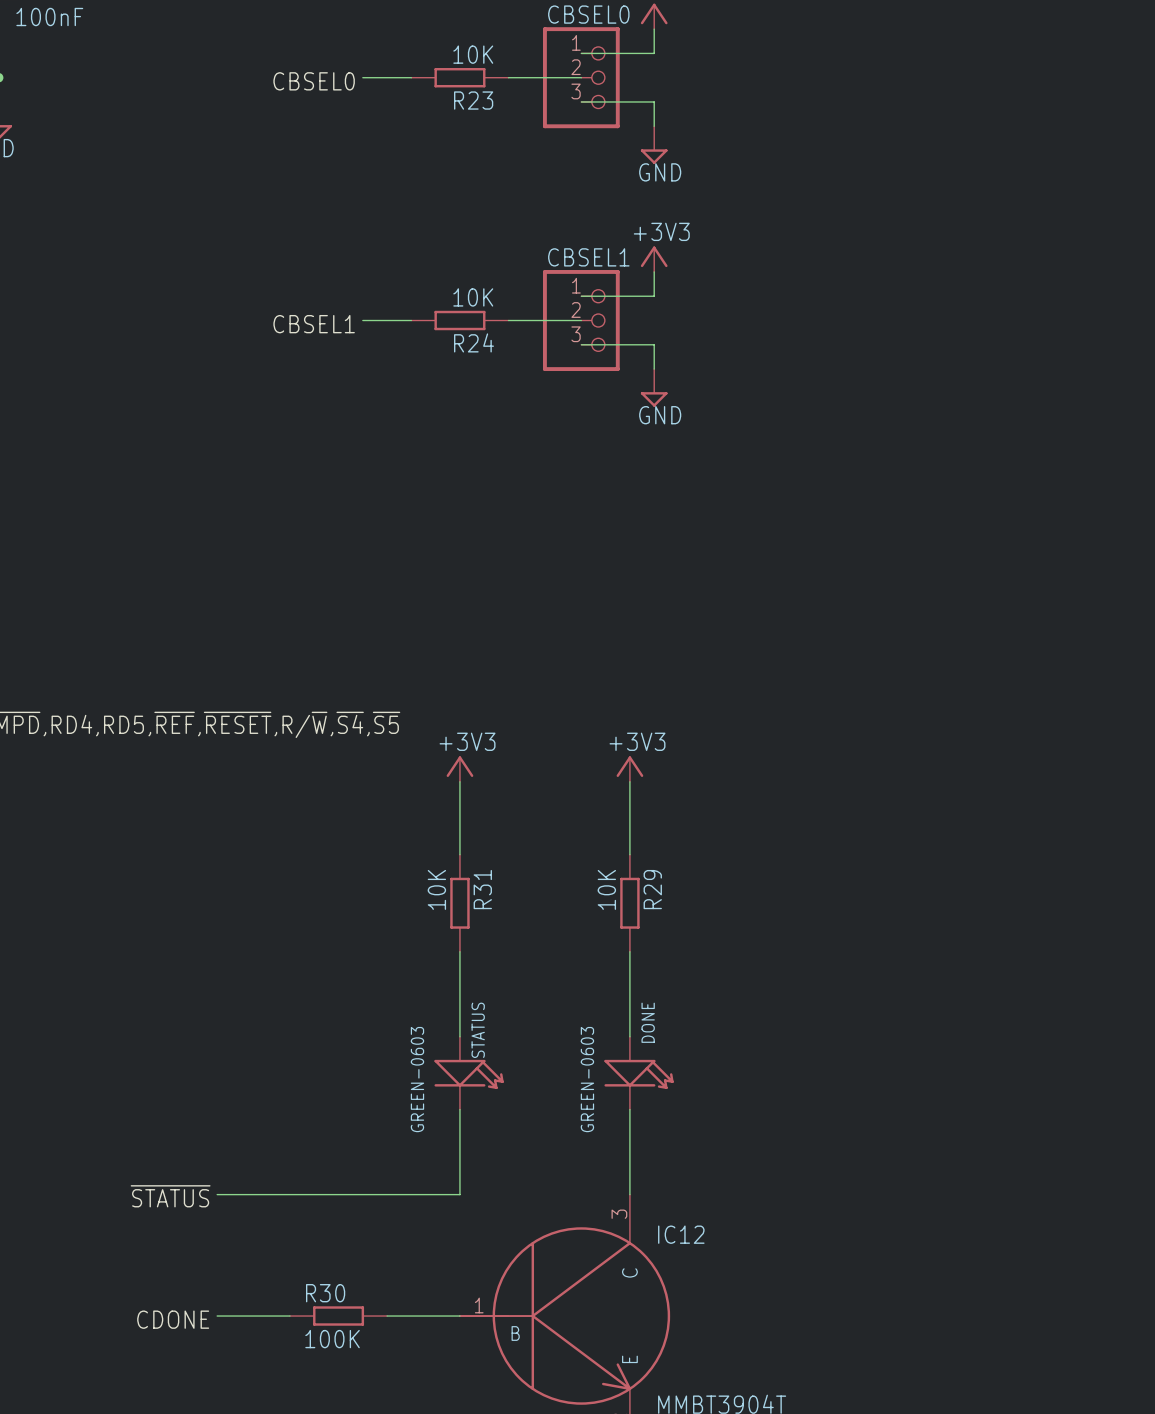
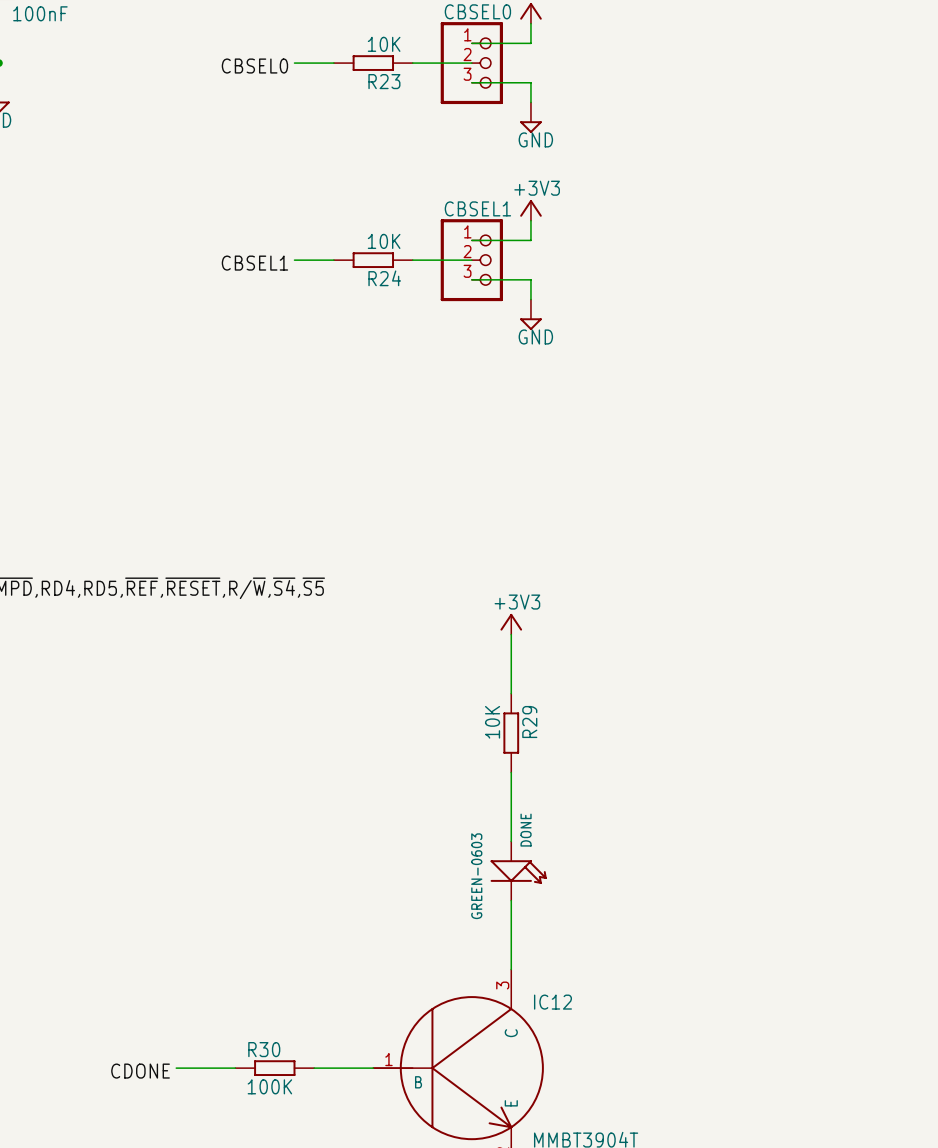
power symbol: +3V3 (459, 769) -> none
wire: (459, 781) (459, 854) -> none
R31: 10K (459, 903) -> none
wire: (459, 951) (459, 1036) -> none
STATUS: GREEN-0603 (469, 1073) -> none
wire: (459, 1109) (459, 1194) (217, 1194) -> none
label: ~{STATUS} (170, 1196) -> none

